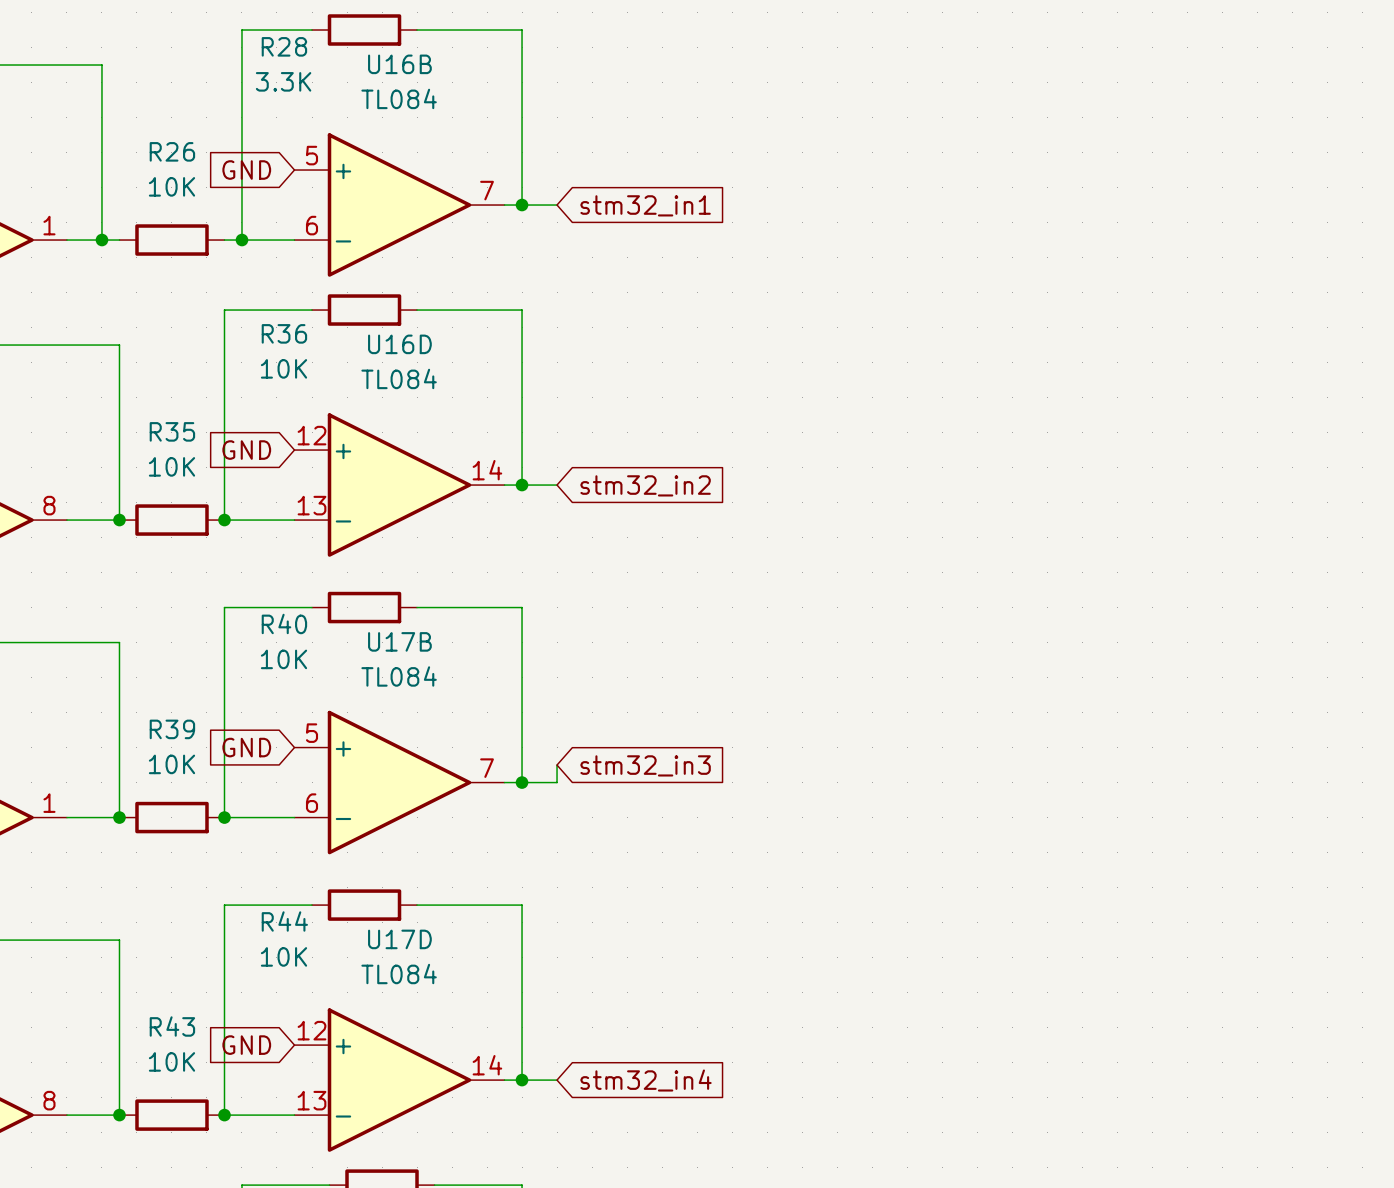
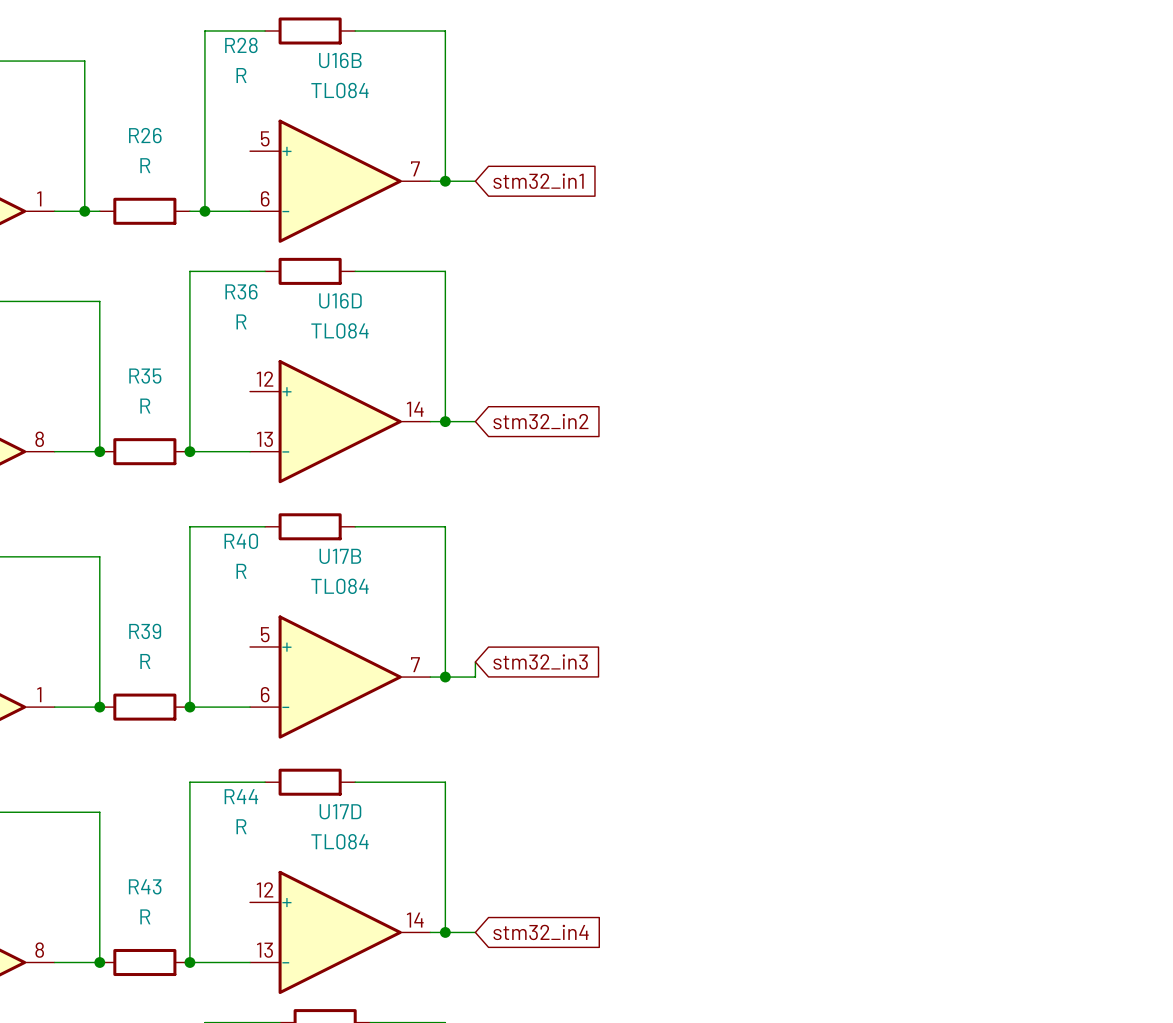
R28 value: 3.3K (283, 81) -> R (241, 75)
global label: GND (246, 170) -> none
R26 value: 10K (171, 186) -> R (145, 165)
R36 value: 10K (283, 368) -> R (241, 321)
global label: GND (246, 450) -> none
R35 value: 10K (171, 466) -> R (145, 406)
R40 value: 10K (283, 659) -> R (241, 571)
global label: GND (246, 747) -> none
R39 value: 10K (171, 764) -> R (145, 661)
R44 value: 10K (283, 956) -> R (241, 826)
global label: GND (246, 1045) -> none
R43 value: 10K (171, 1061) -> R (145, 916)

